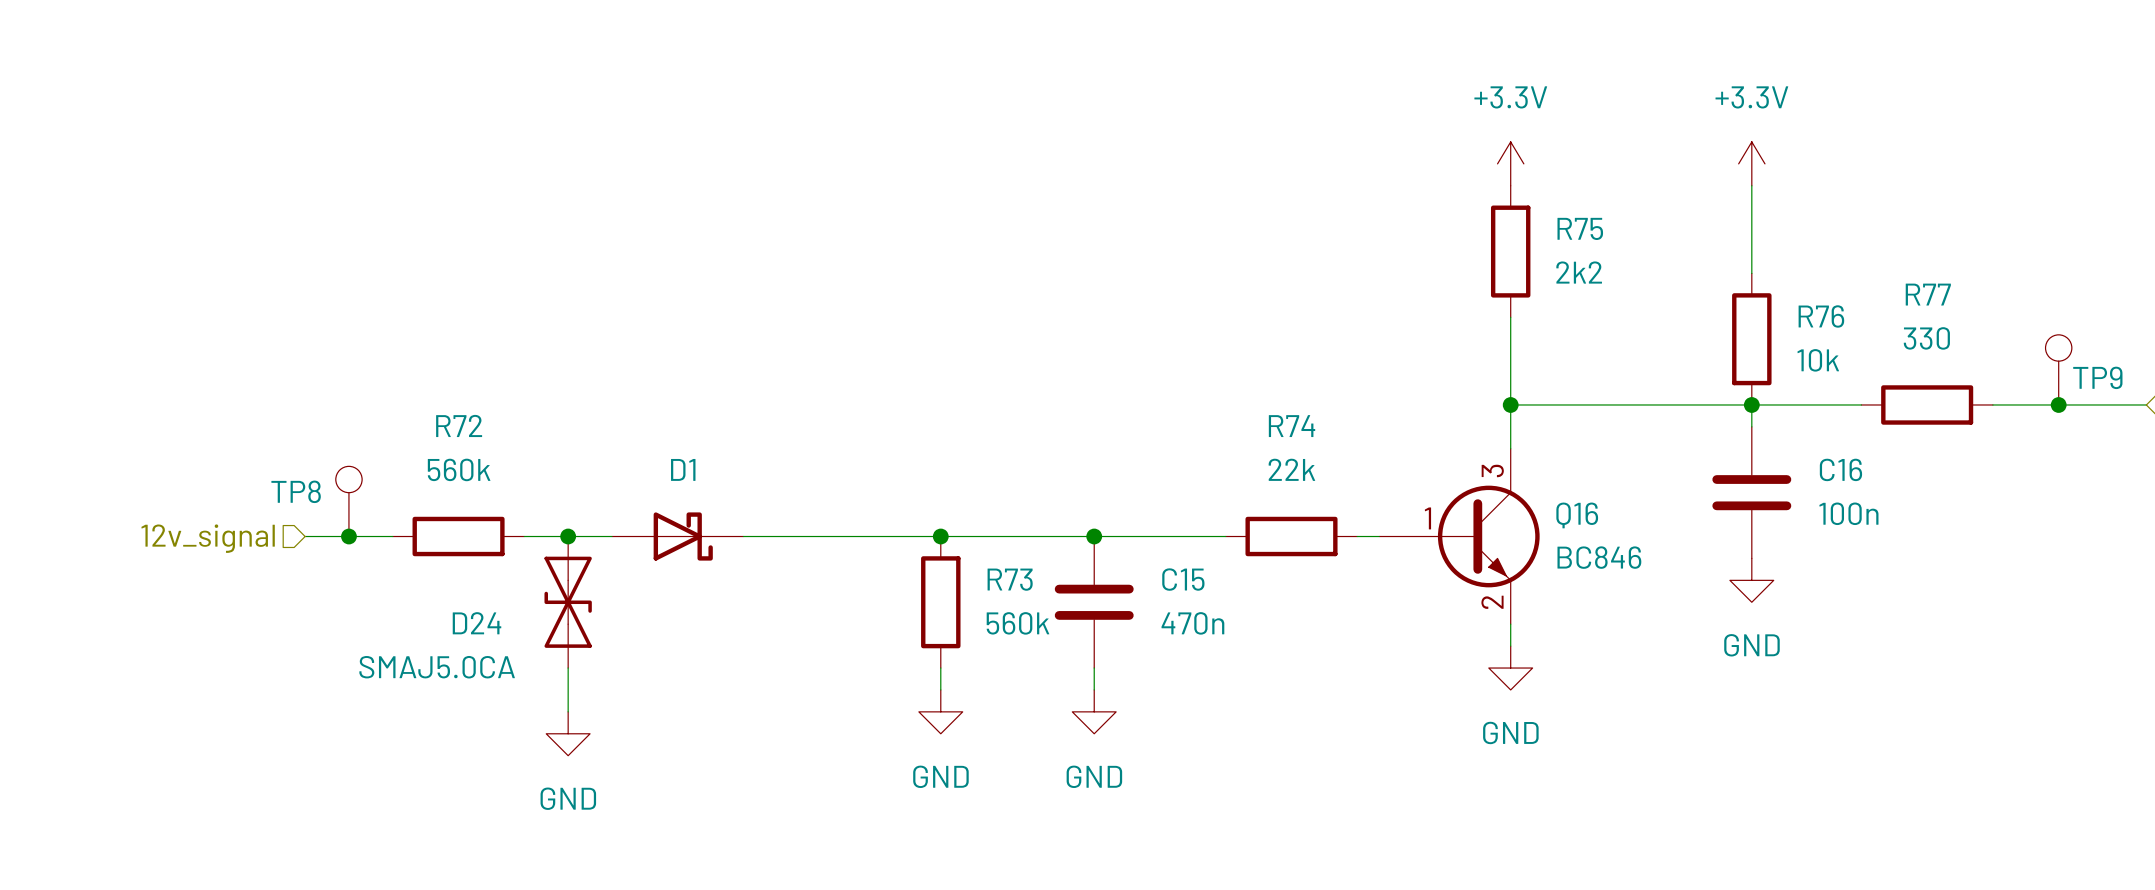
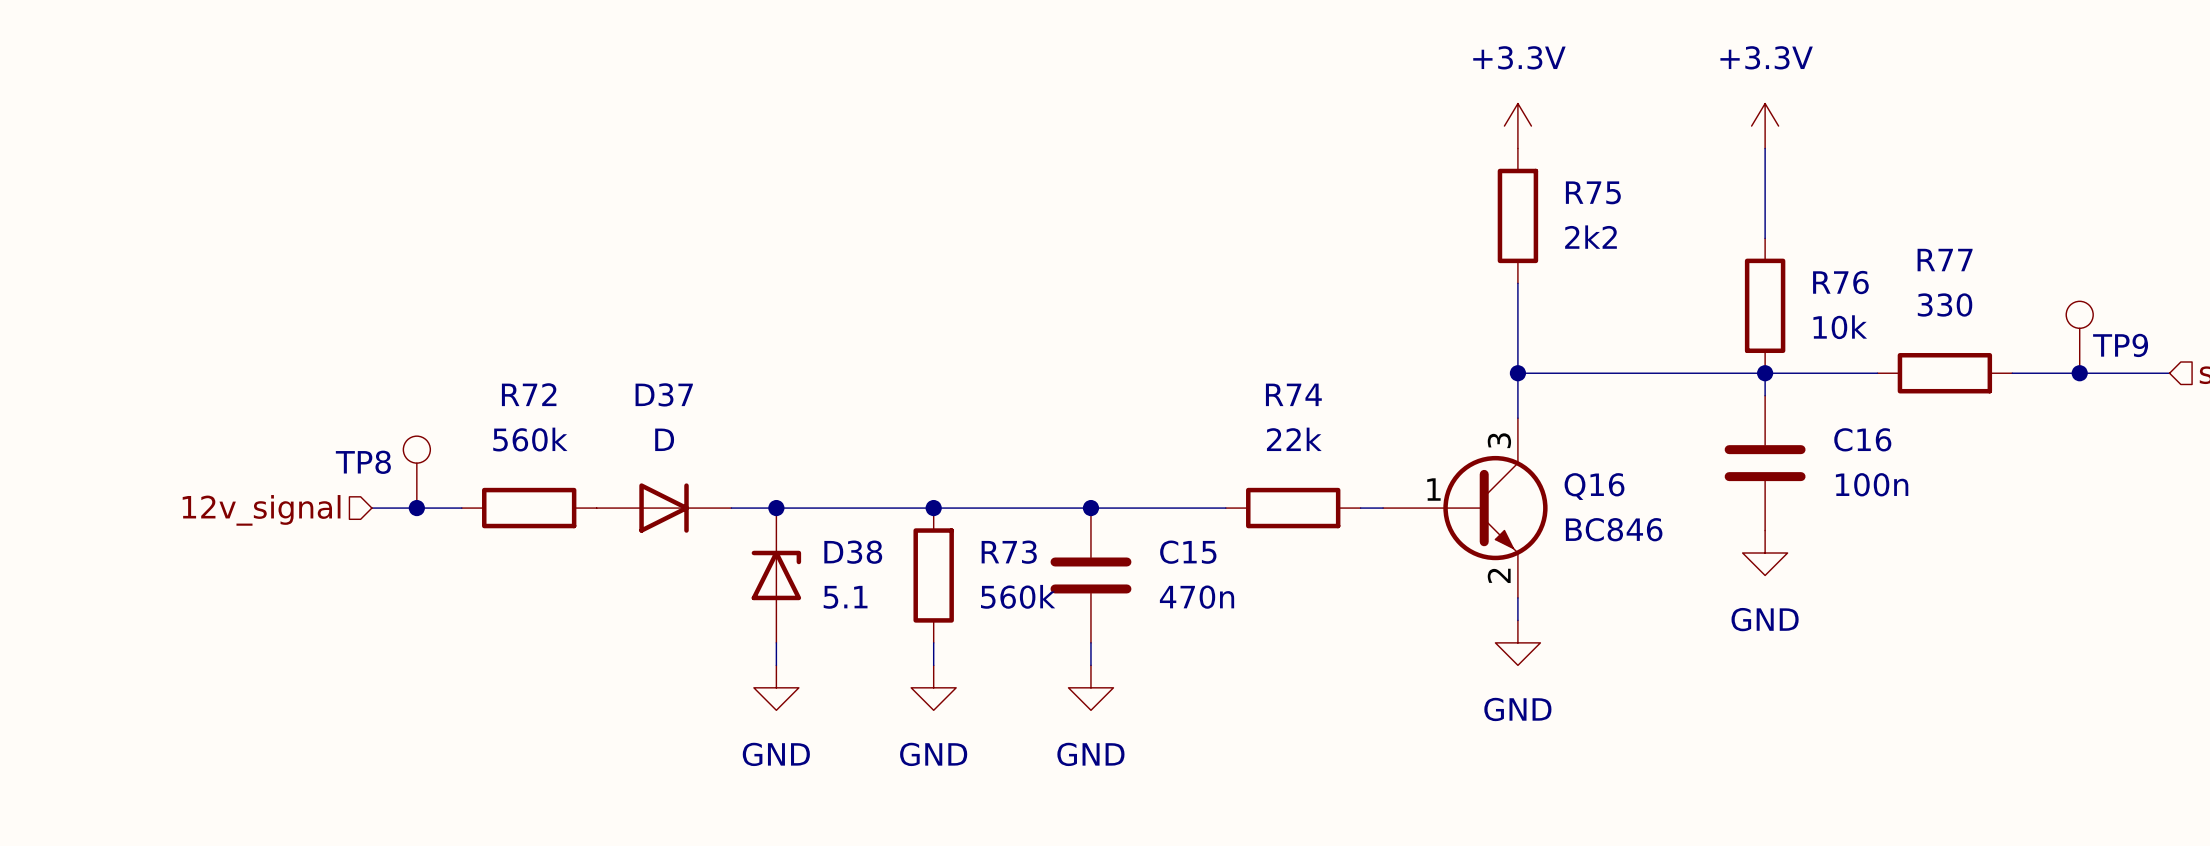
TP8 position: (348, 501) -> (416, 472)
wire: (305, 536) (392, 536) -> (461, 508) (371, 508)
junction: (348, 536) -> none
junction: none -> (416, 508)
R72 position: (458, 536) -> (529, 508)
wire: (524, 536) (611, 536) -> none
junction: (568, 536) -> none
D1: (677, 536) -> none
D37: none -> D (664, 508)
junction: none -> (776, 508)
hierarchical label position: 12v_signal (208, 538) -> 12v_signal (261, 510)
D24: SMAJ5.0CA (568, 602) -> none
D38: none -> 5.1 (776, 575)
wire: (568, 668) (568, 711) -> none
wire: none -> (776, 642) (776, 665)
power symbol position: GND (568, 733) -> GND (776, 687)

